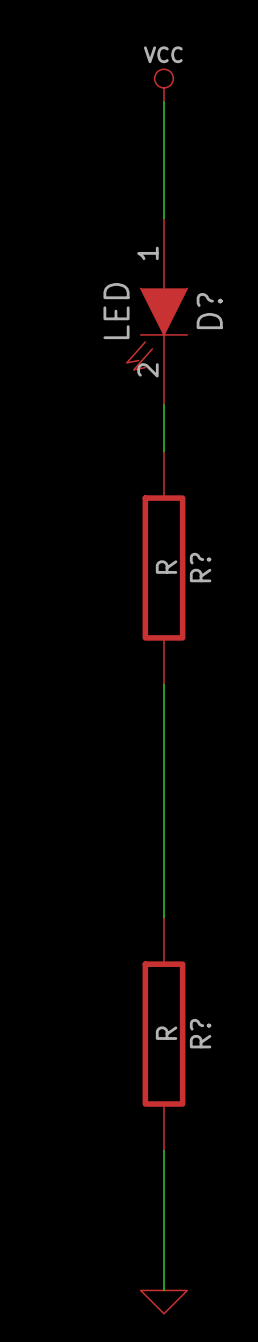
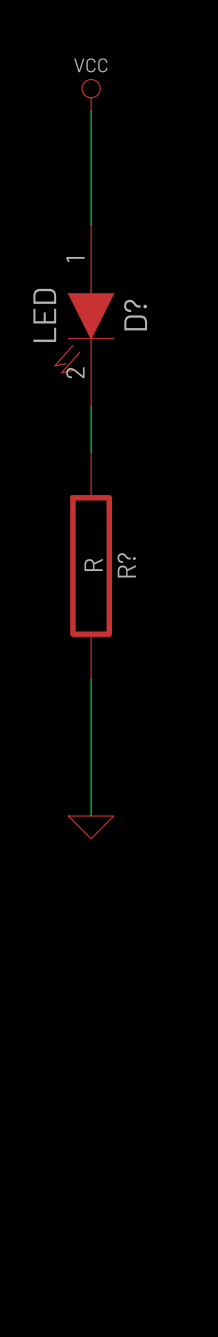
wire: (163, 824) (163, 917) -> none
power symbol: none -> (91, 827)
R?: R (163, 1034) -> none
wire: (163, 1150) (163, 1290) -> none
power symbol: (163, 1302) -> none

